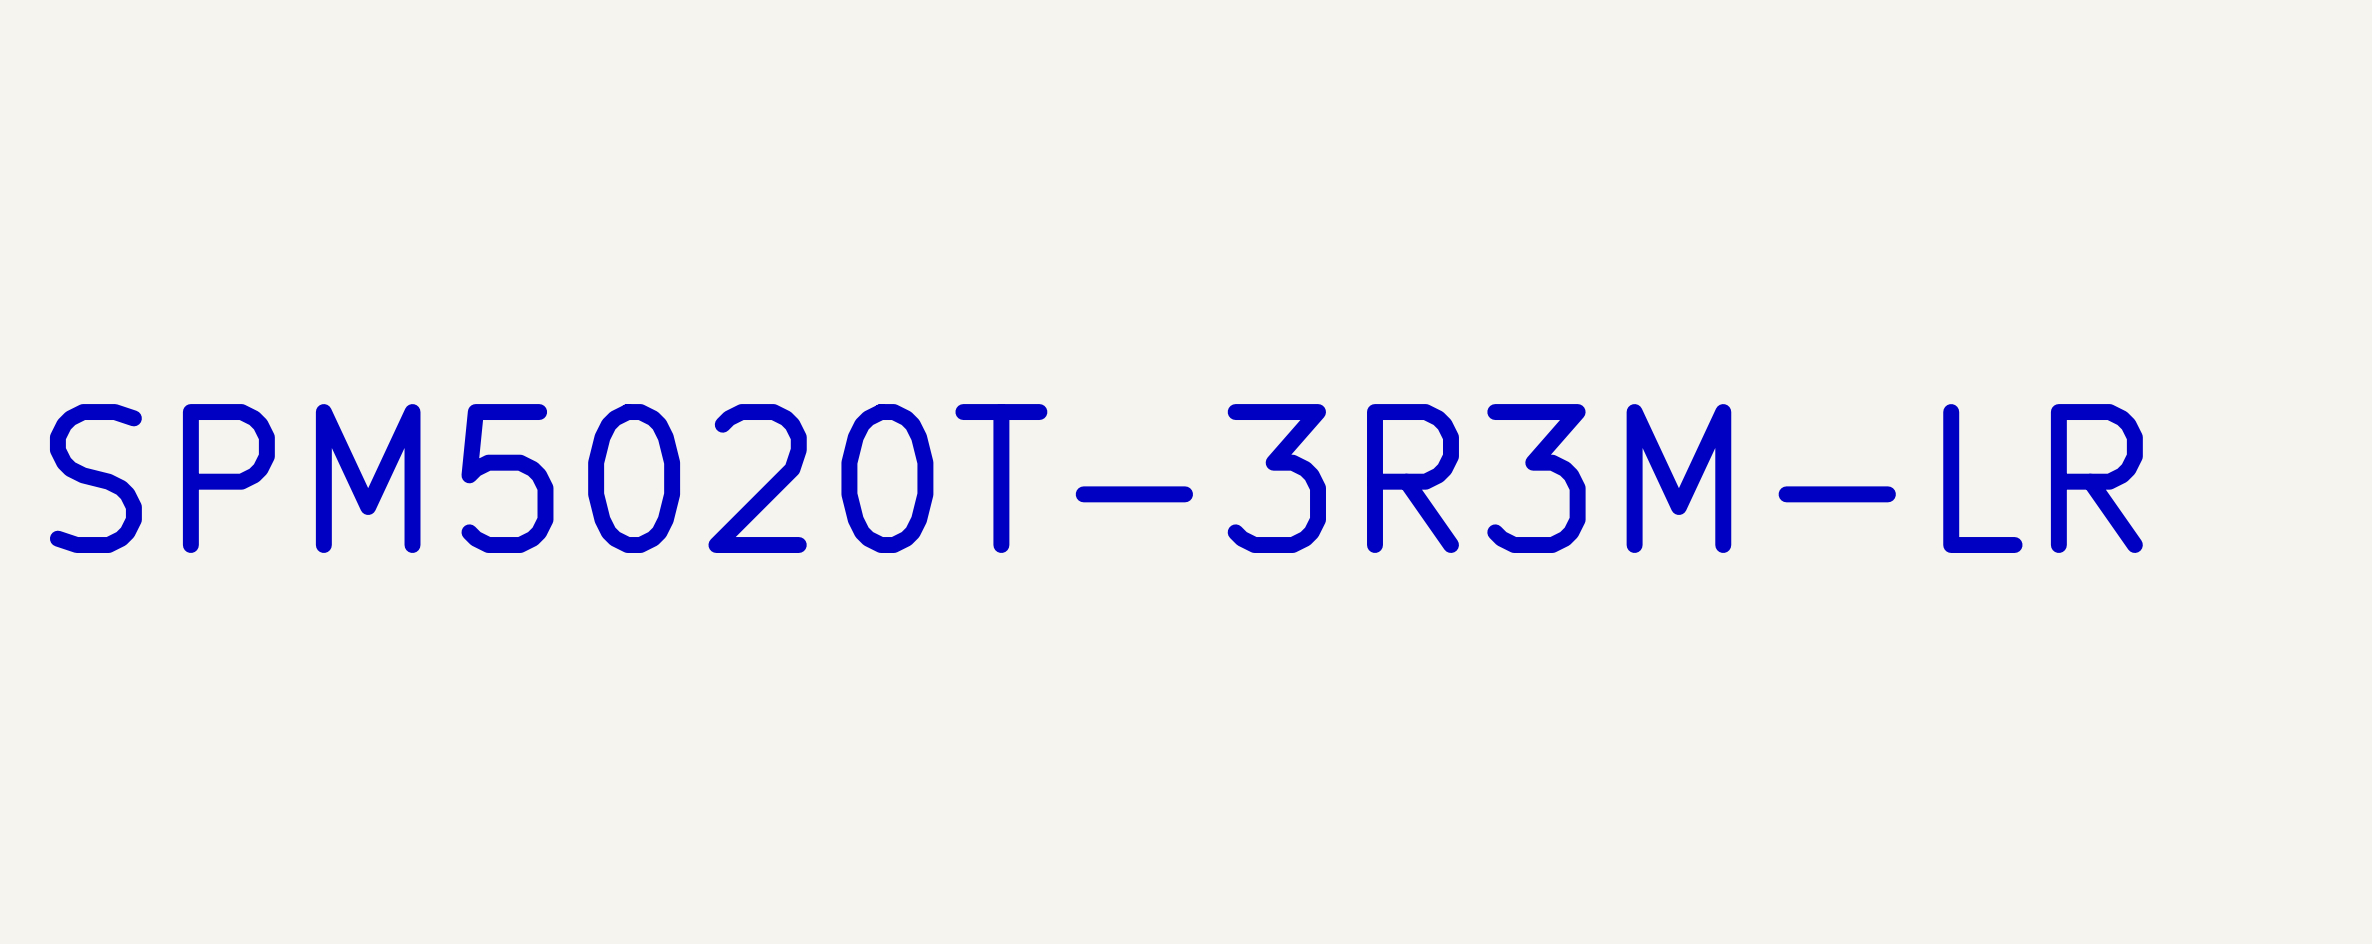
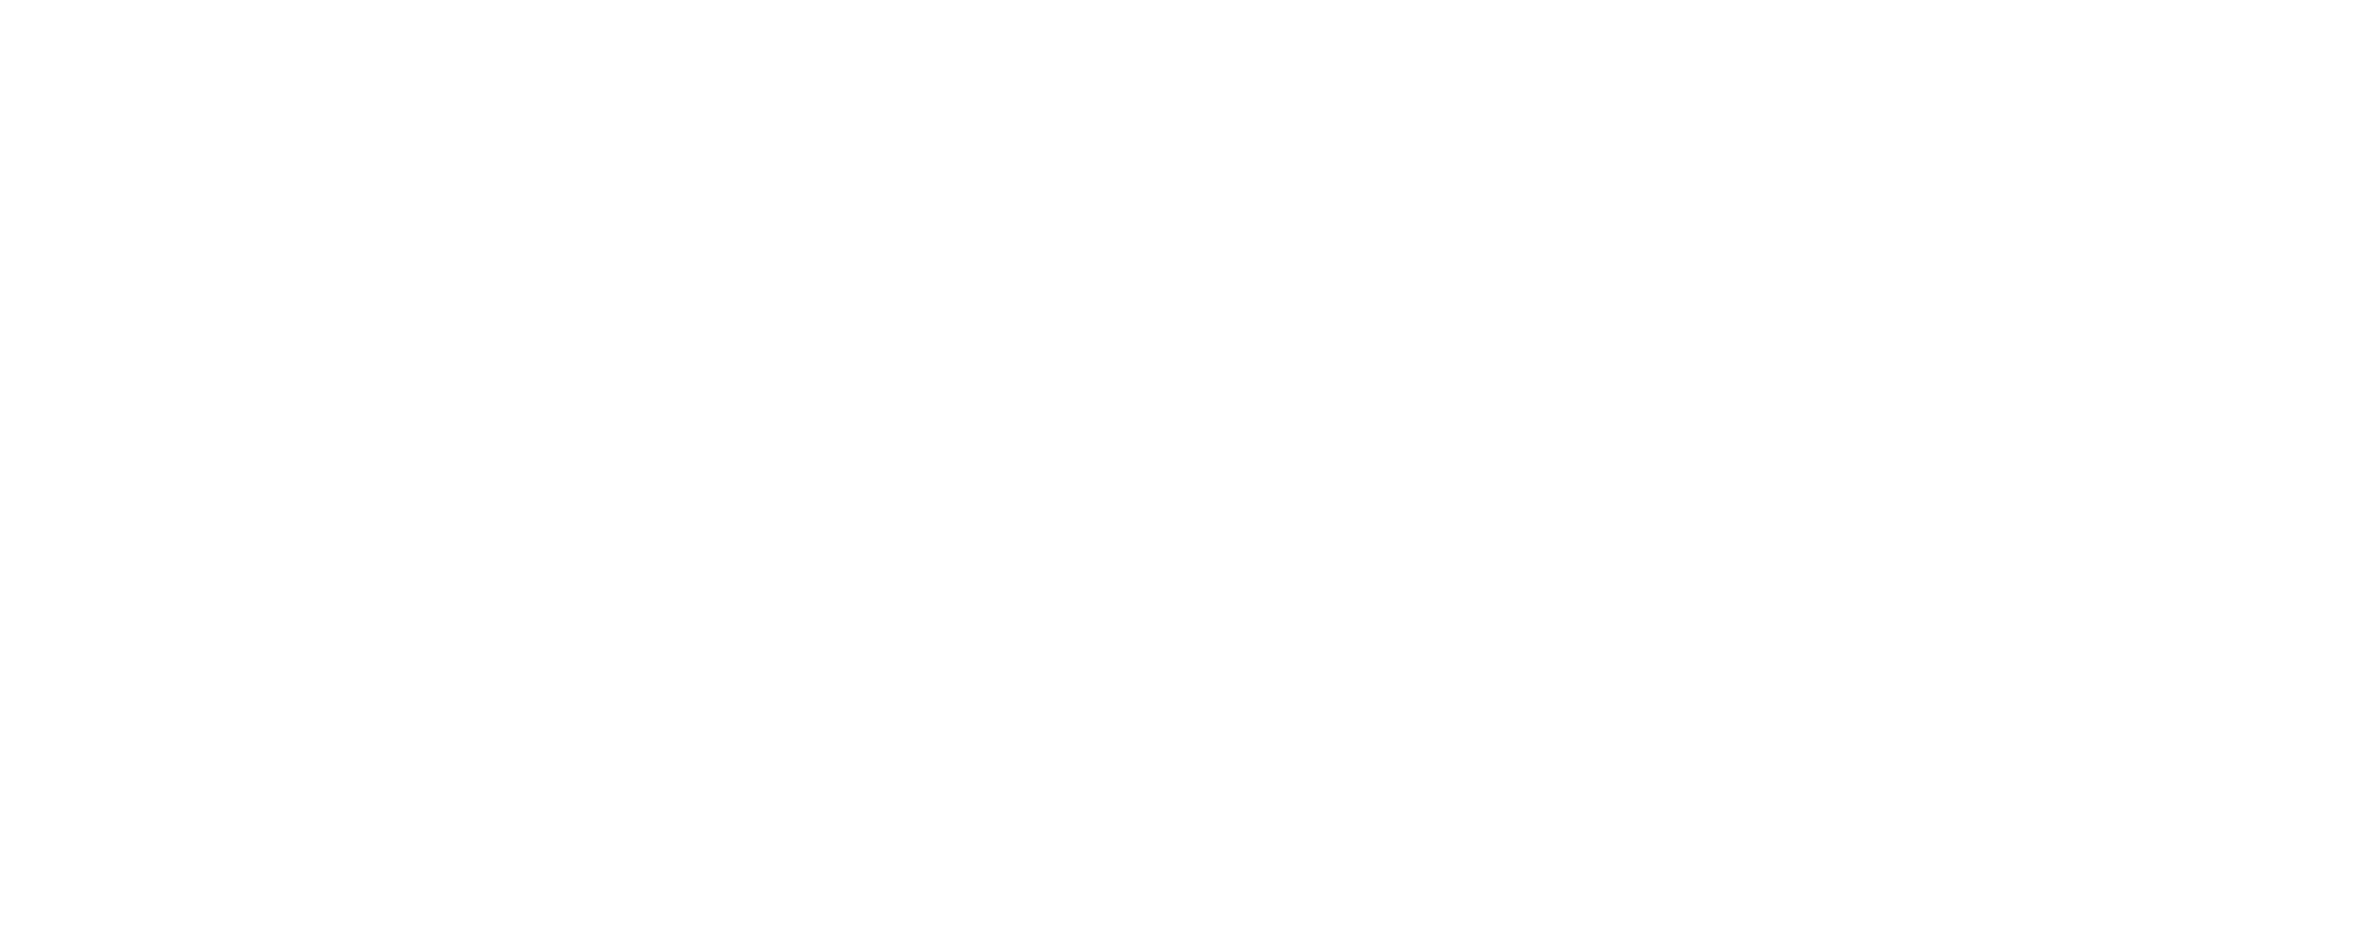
text: SPM5020T-3R3M-LR (1096, 478) -> none

